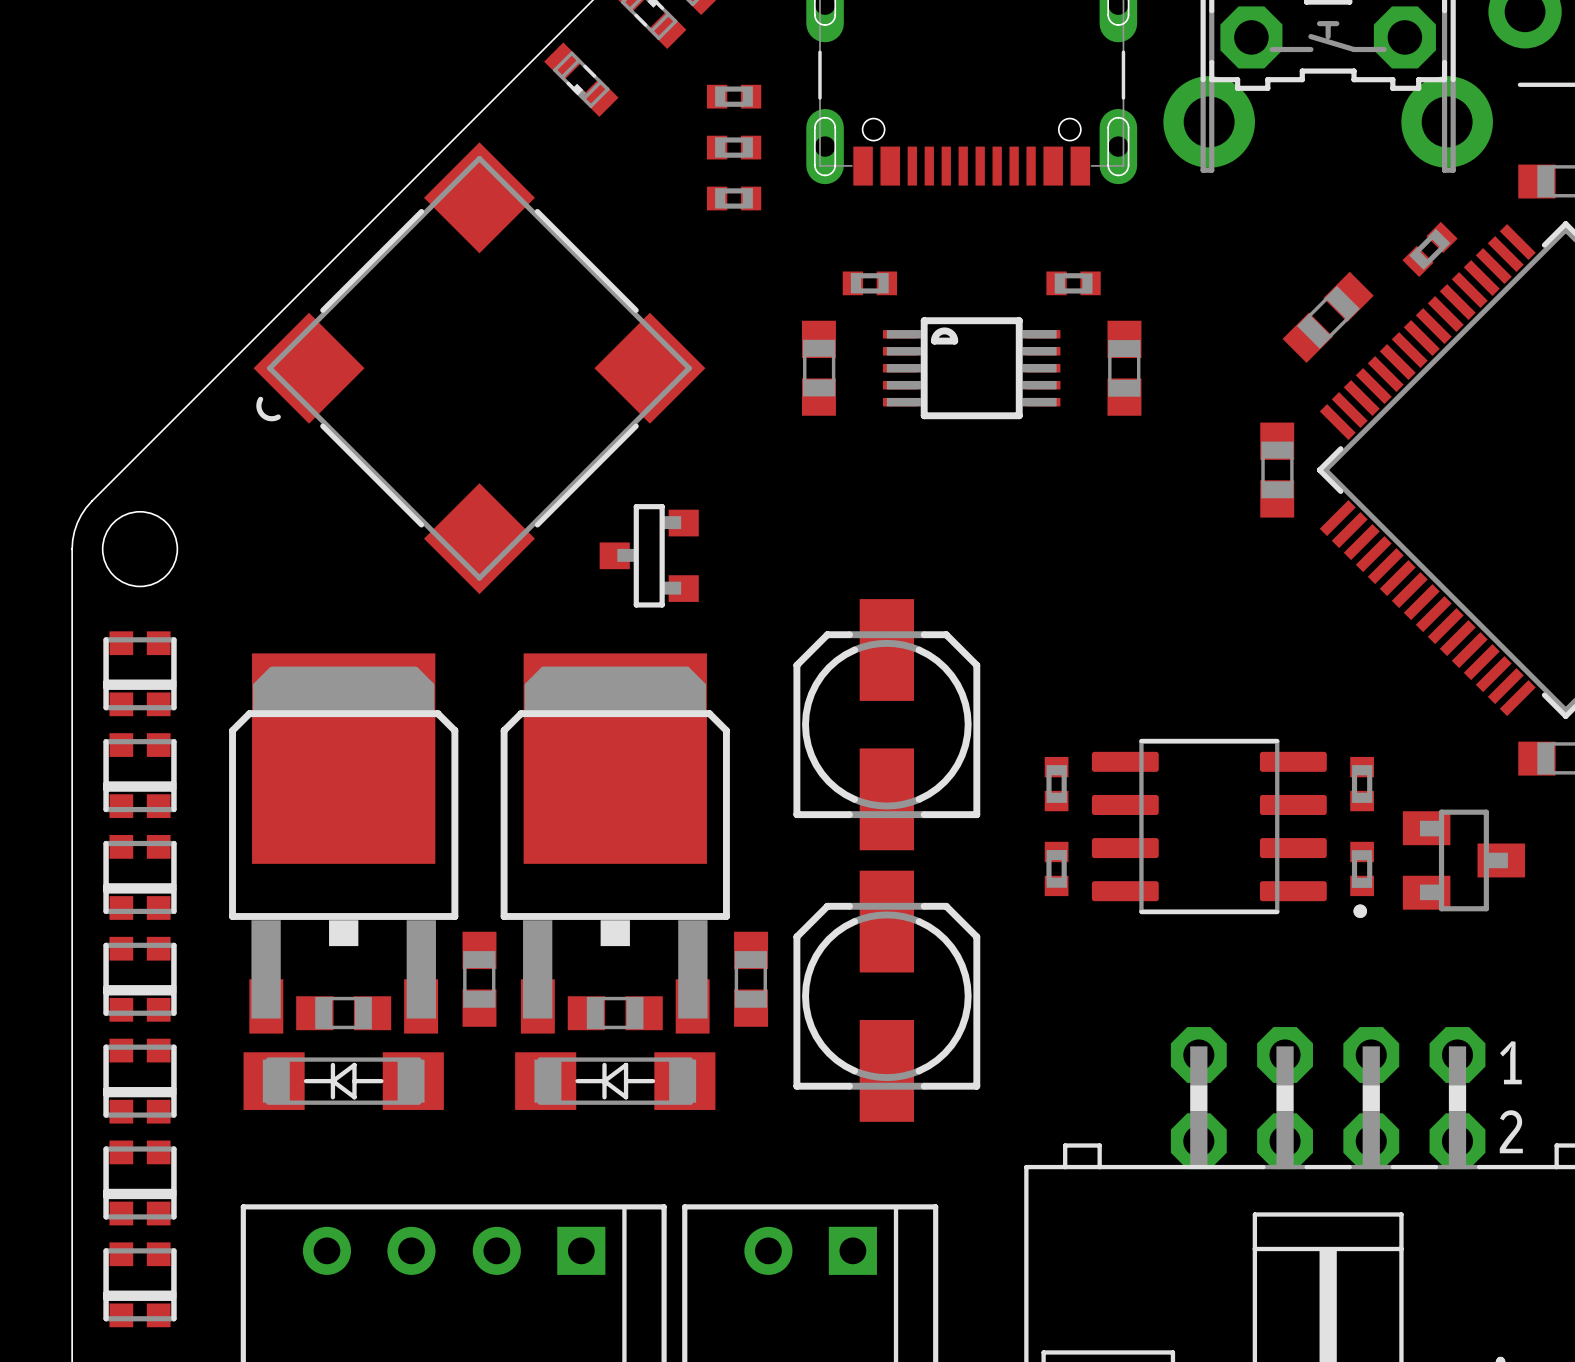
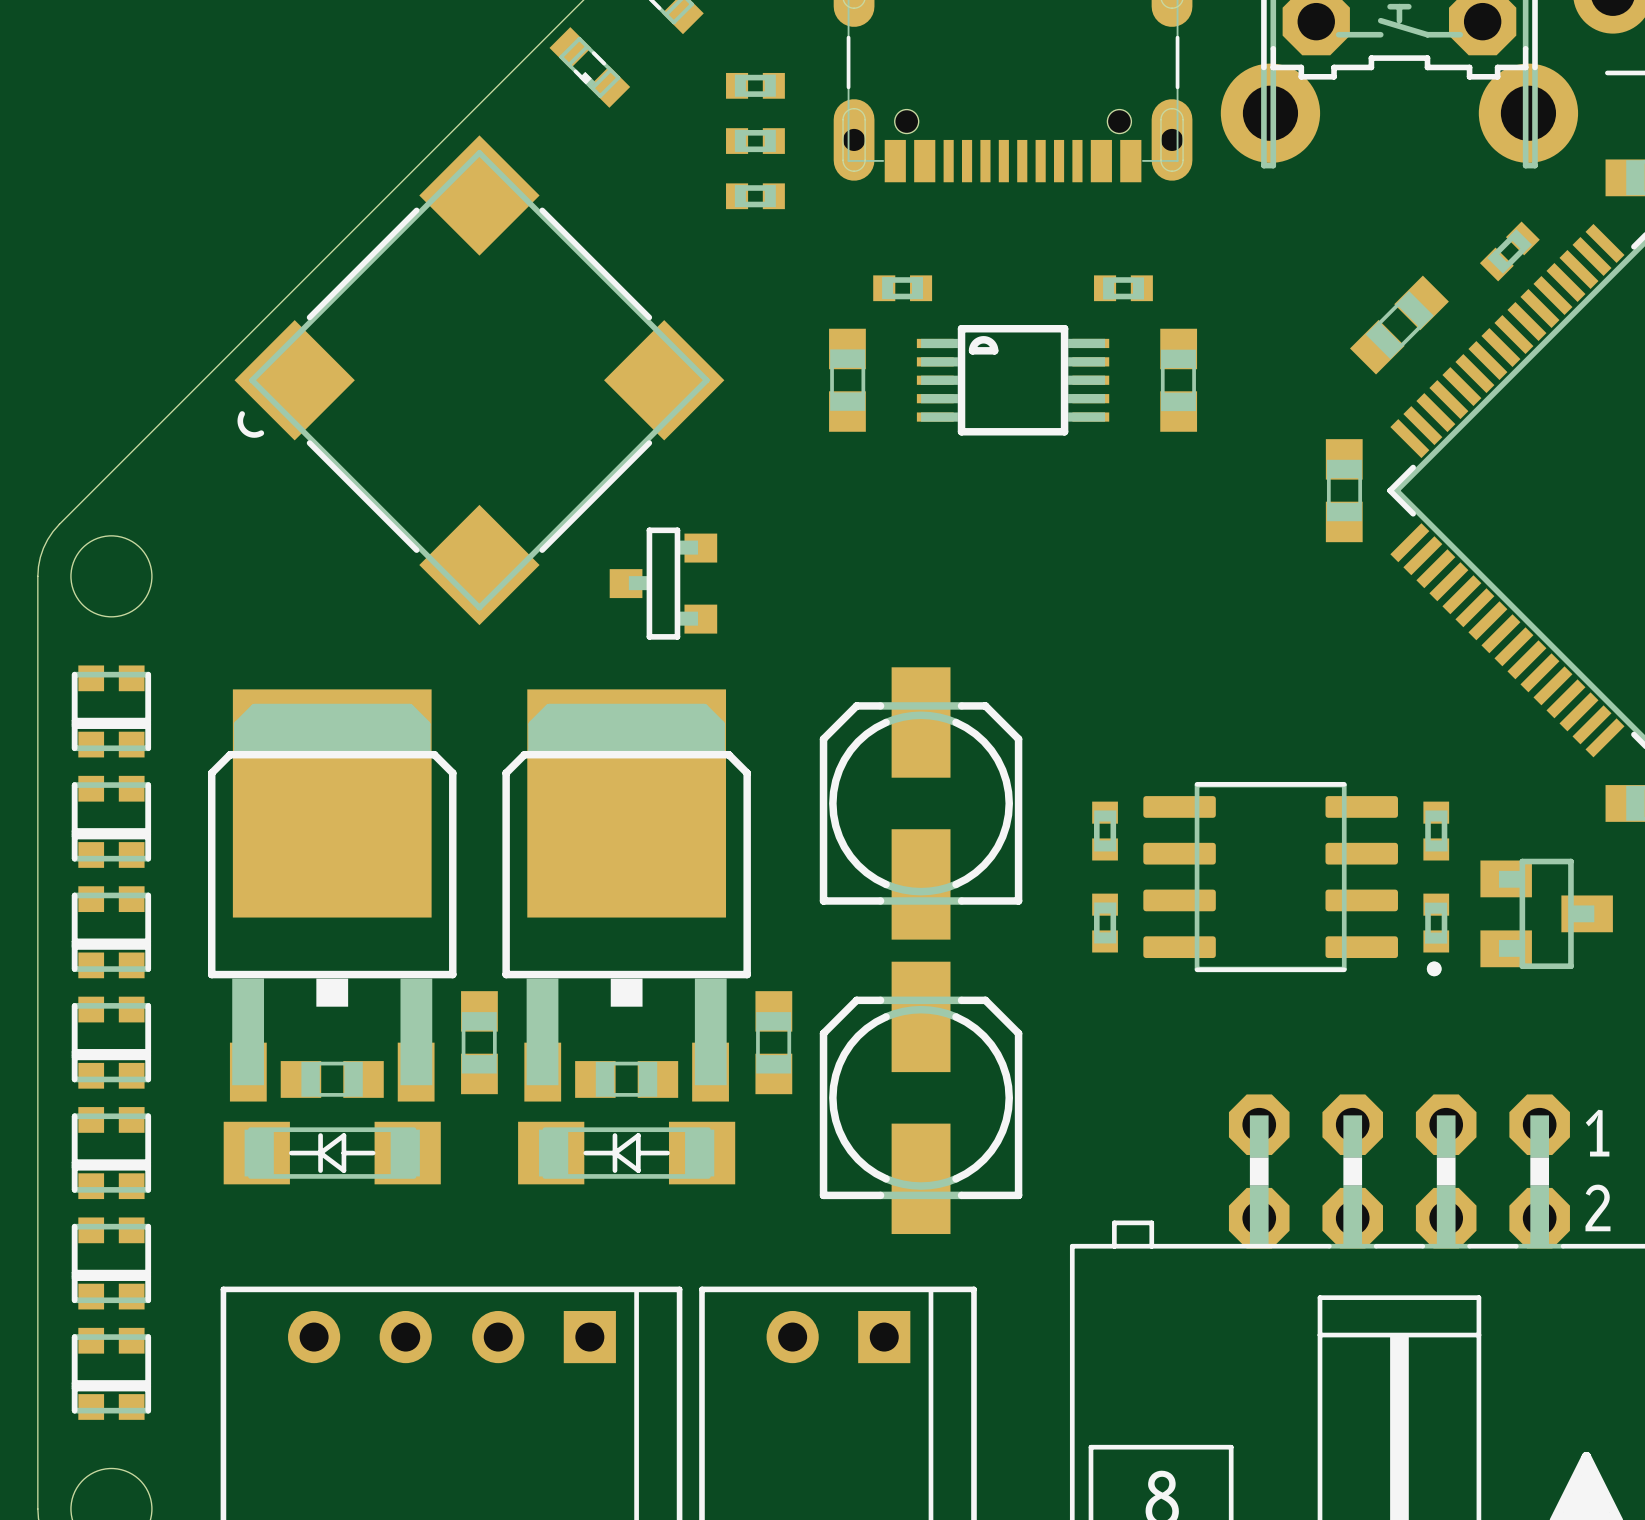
part position: (886, 724) -> (921, 803)
part position: (886, 996) -> (921, 1097)

